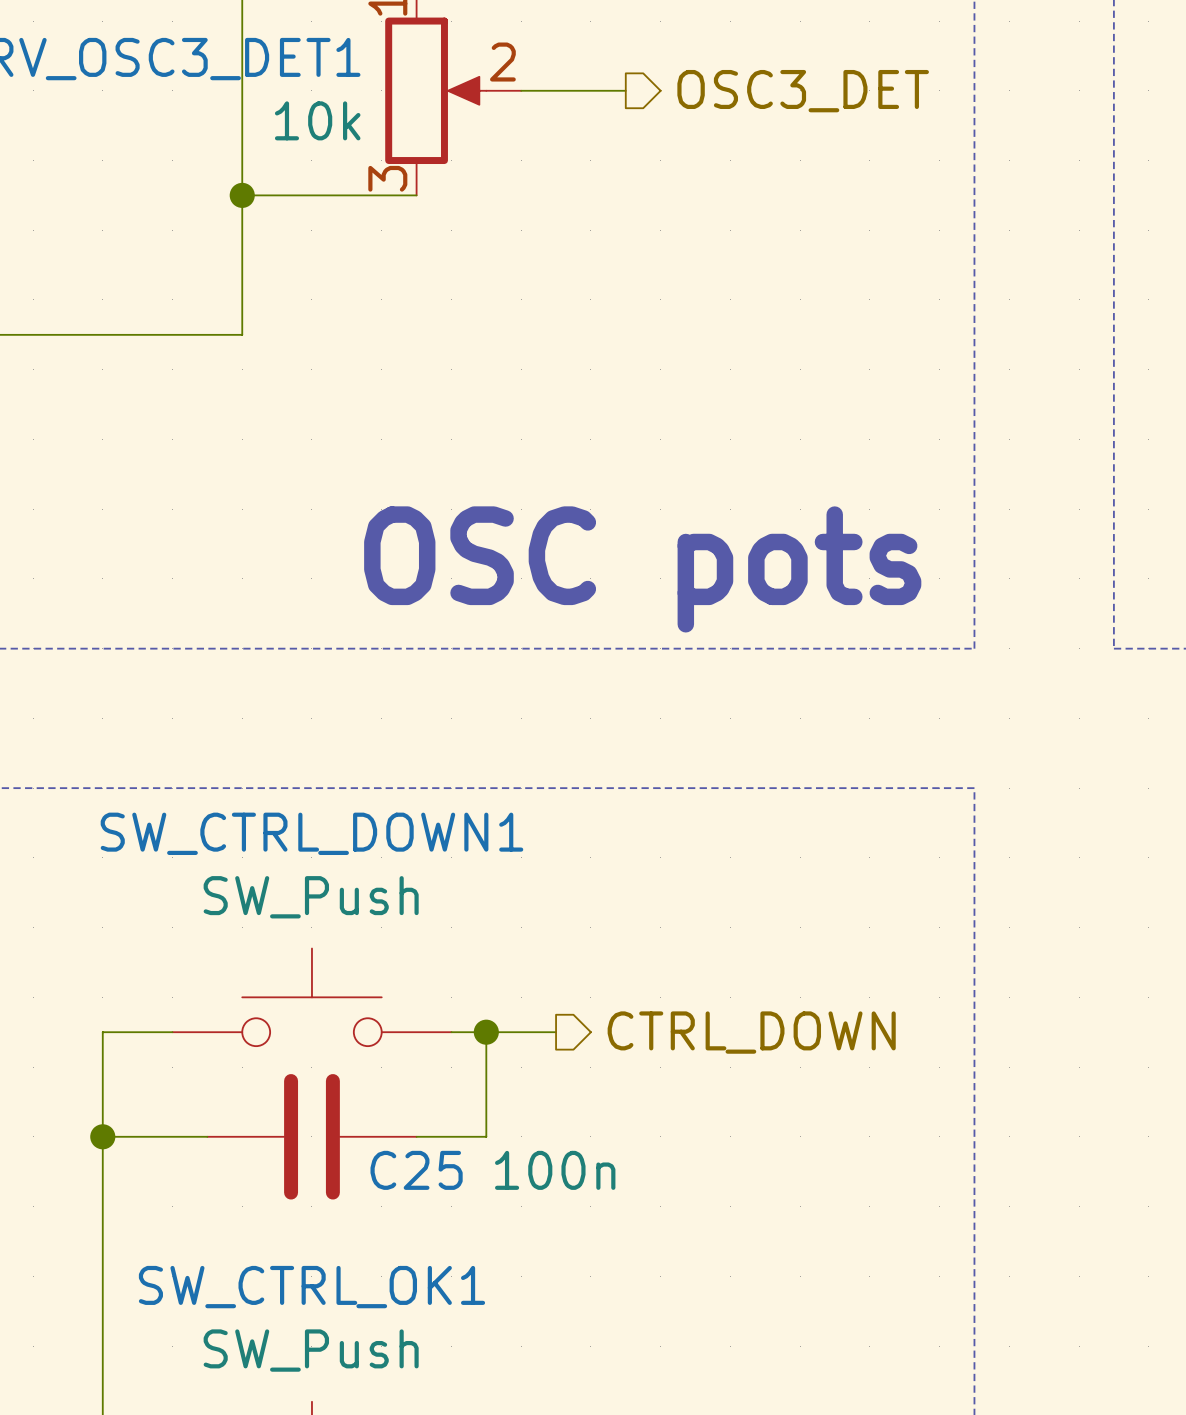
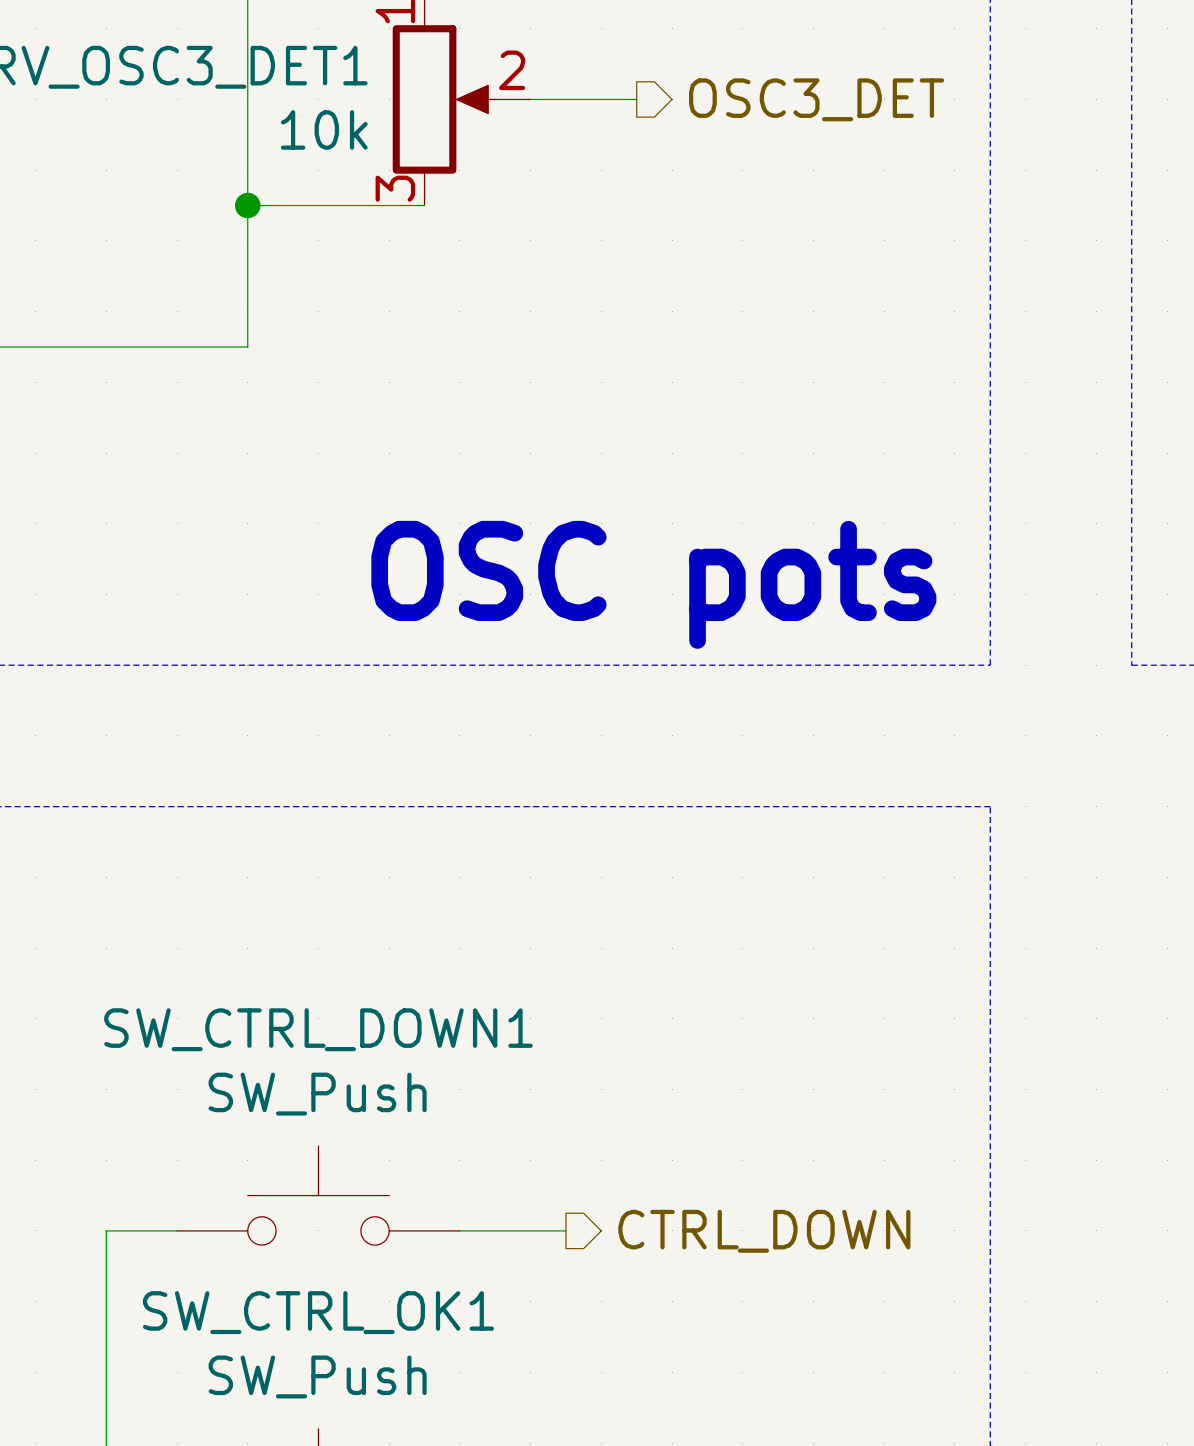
SW_CTRL_DOWN1 position: (311, 997) -> (318, 1195)
wire: (172, 1032) (102, 1032) (102, 1206) -> (177, 1230) (106, 1230)
wire: (451, 1032) (556, 1032) -> (459, 1230) (565, 1230)
wire: (486, 1032) (486, 1136) (416, 1136) -> none
junction: (486, 1032) -> none
hierarchical label position: CTRL_DOWN (751, 1032) -> CTRL_DOWN (764, 1231)
wire: (102, 1136) (207, 1136) -> none
junction: (102, 1136) -> none
C25: 100n (311, 1136) -> none

